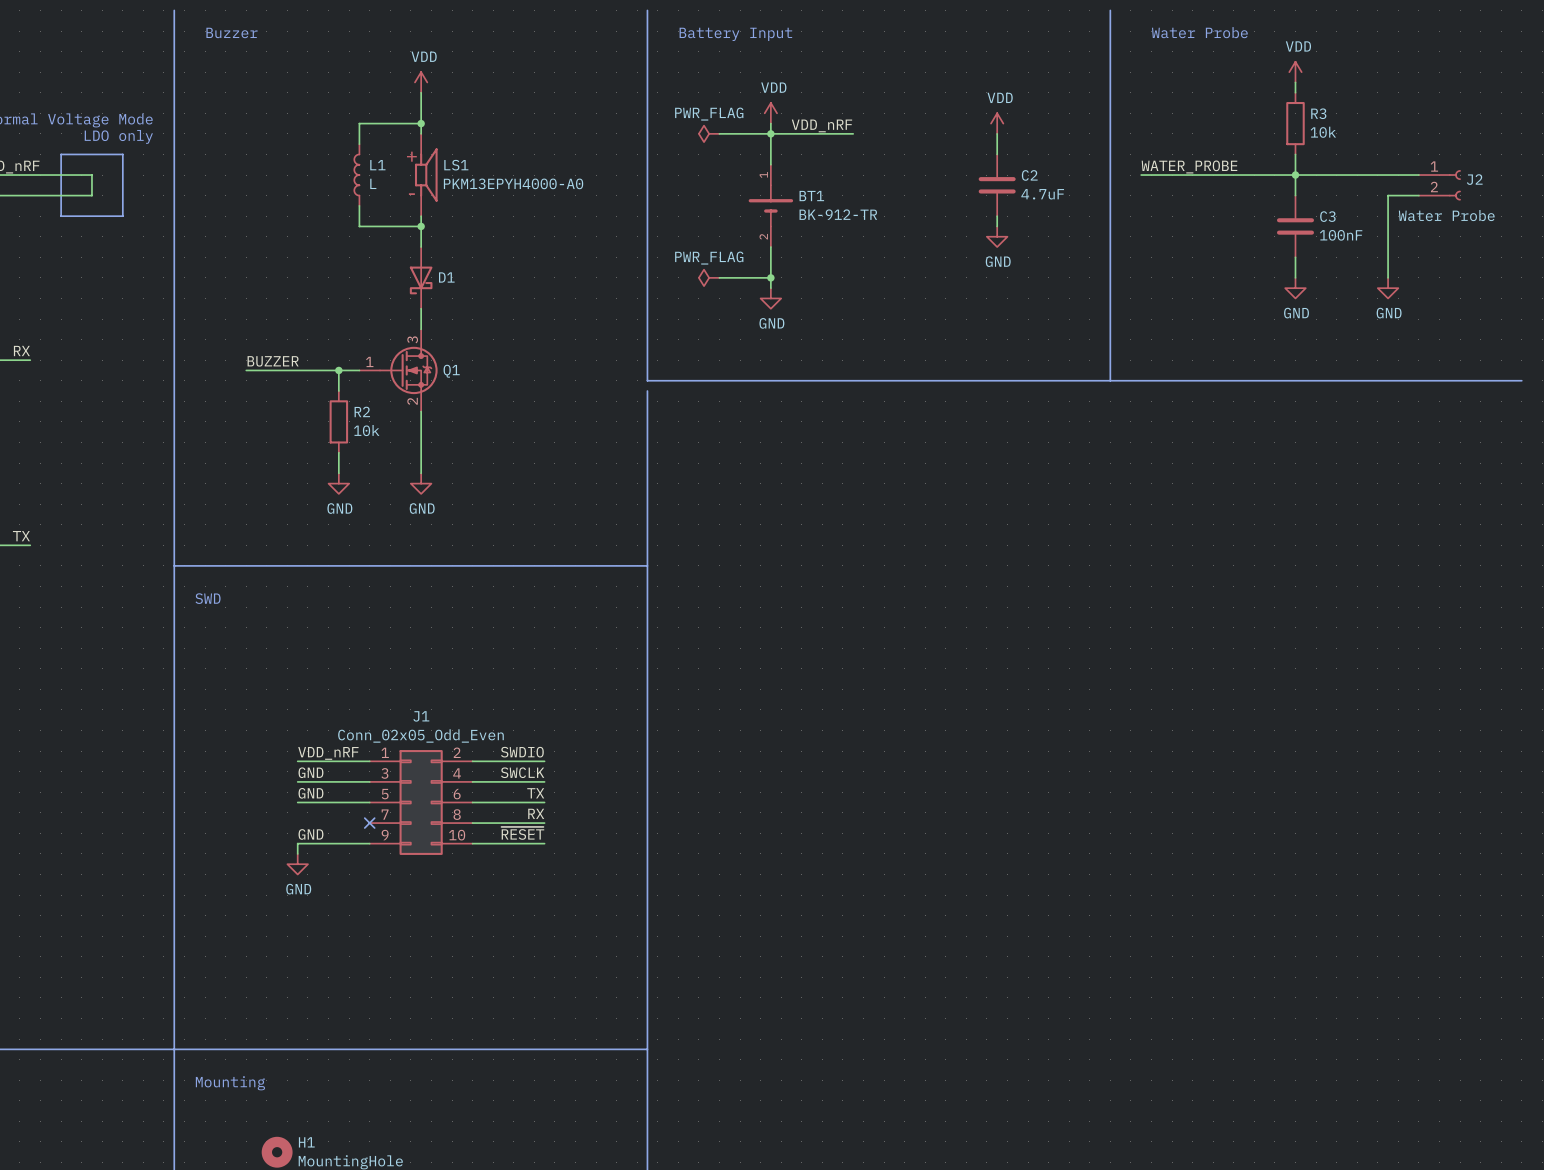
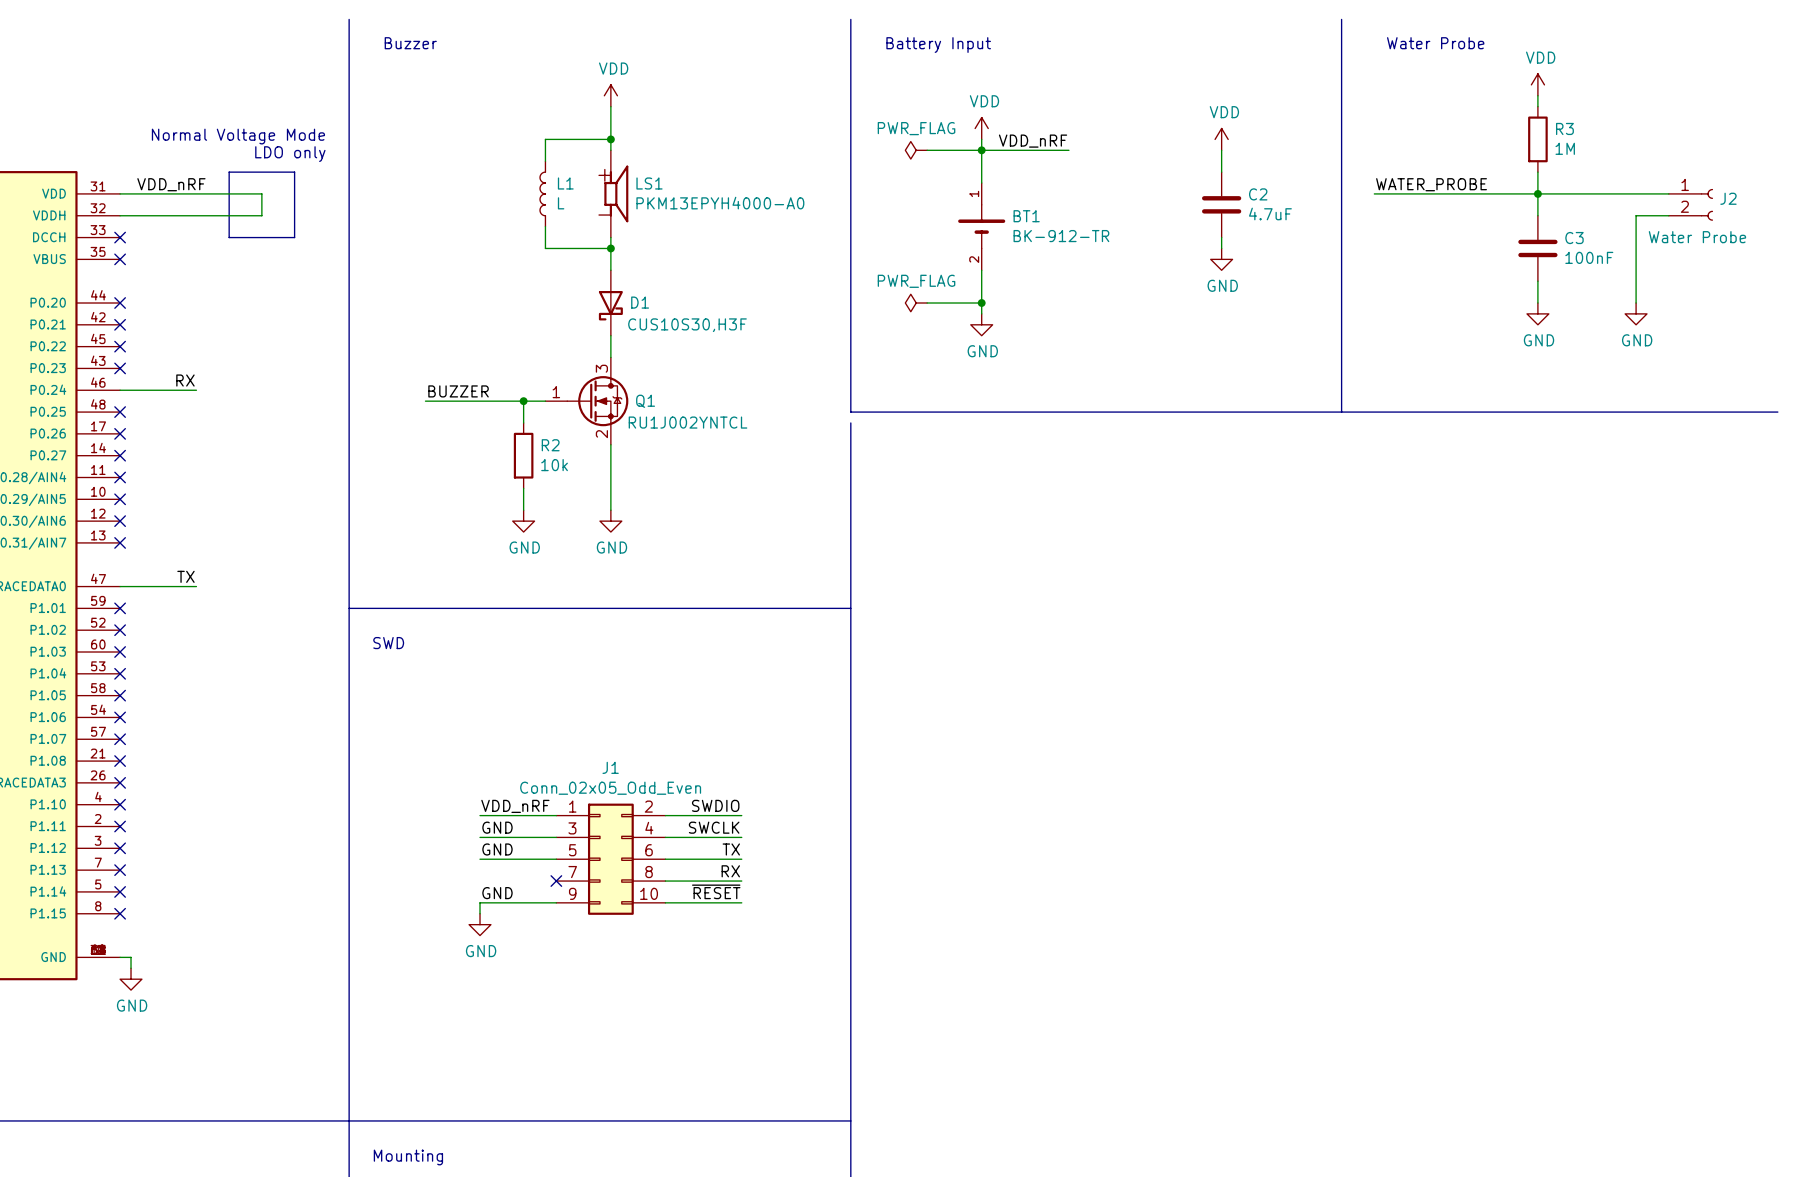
R3 value: 10k (1323, 132) -> 1M (1565, 148)
D1 text: none -> CUS10S30,H3F (687, 325)
Q1 text: none -> RU1J002YNTCL (688, 422)

